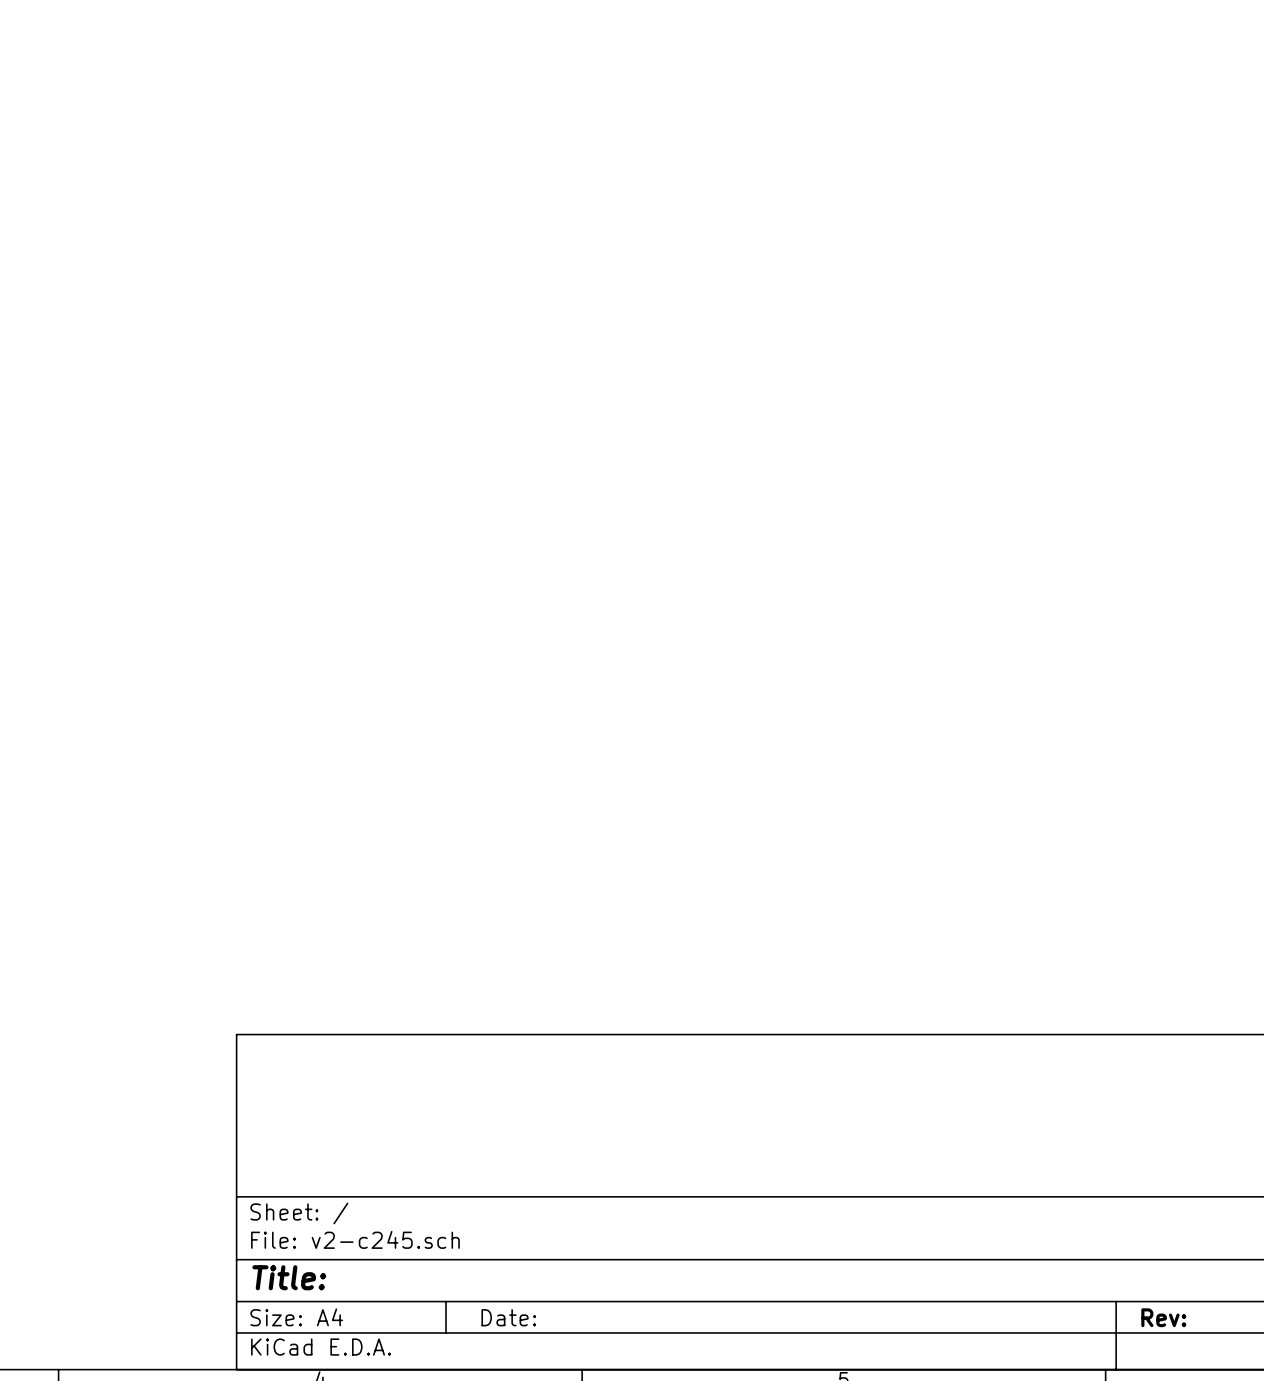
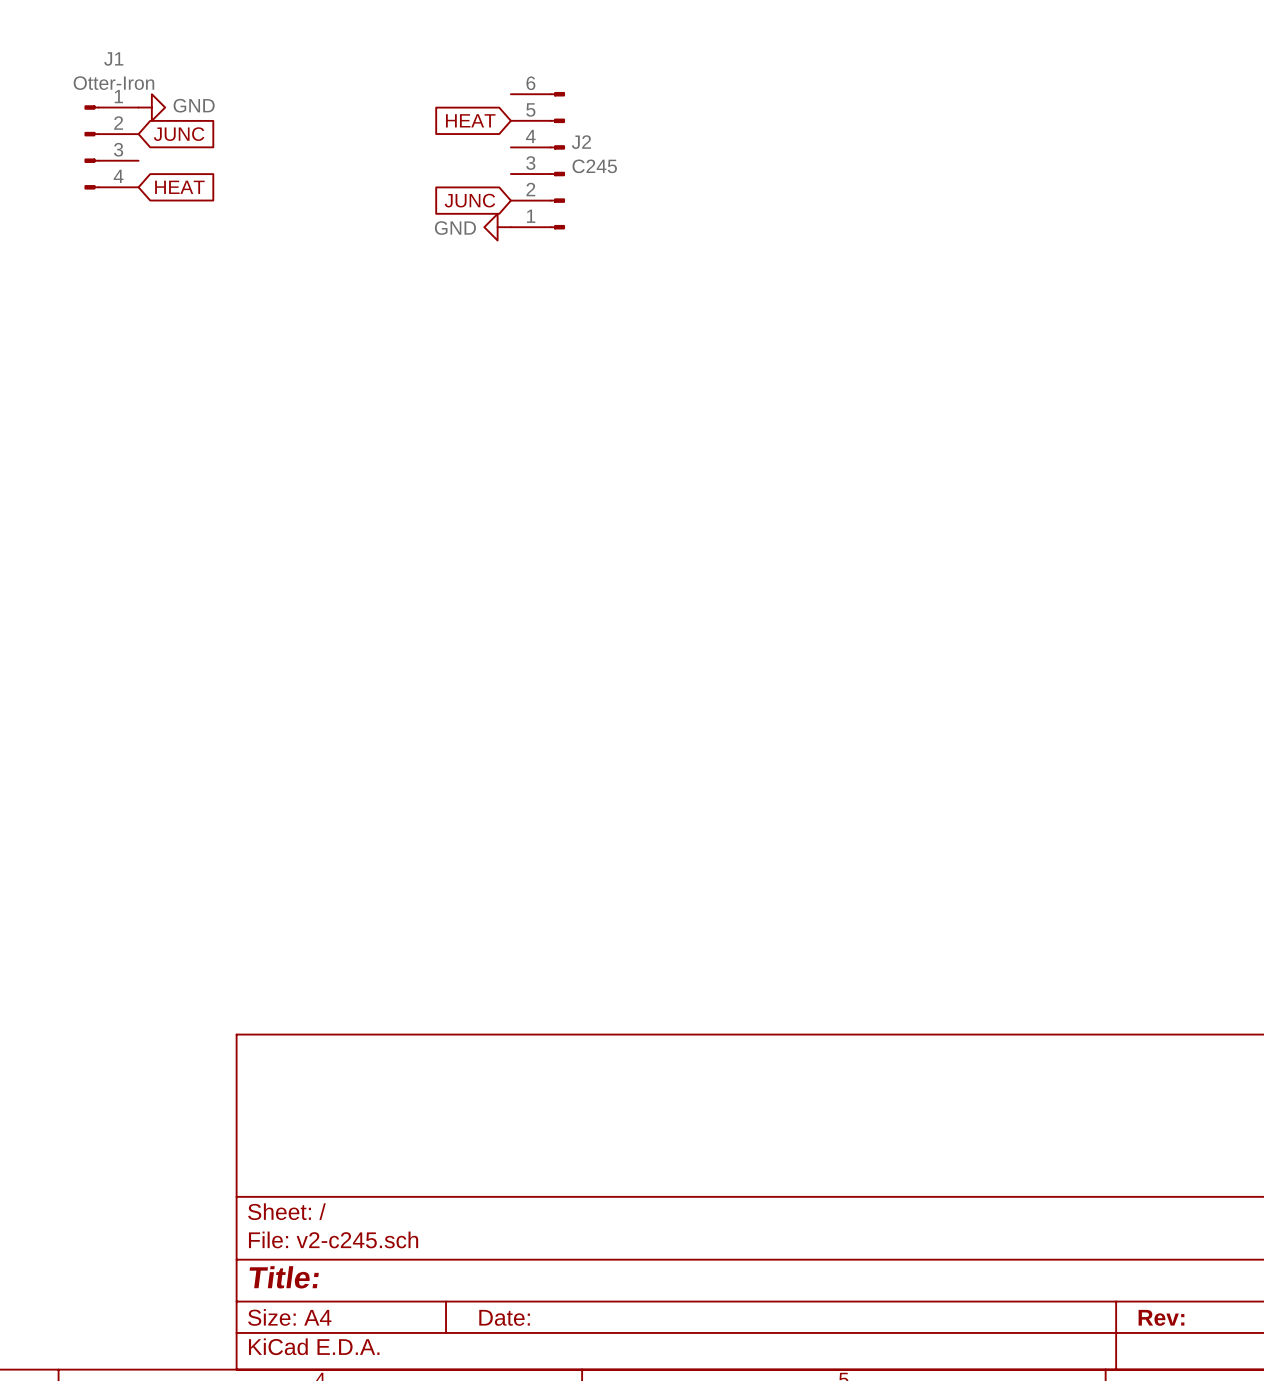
power symbol: none -> GND (151, 107)
global label: none -> HEAT (470, 120)
global label: none -> JUNC (179, 134)
J1: none -> Otter-Iron (111, 147)
J2: none -> C245 (537, 160)
global label: none -> HEAT (179, 187)
global label: none -> JUNC (469, 200)
power symbol: none -> GND (497, 227)

